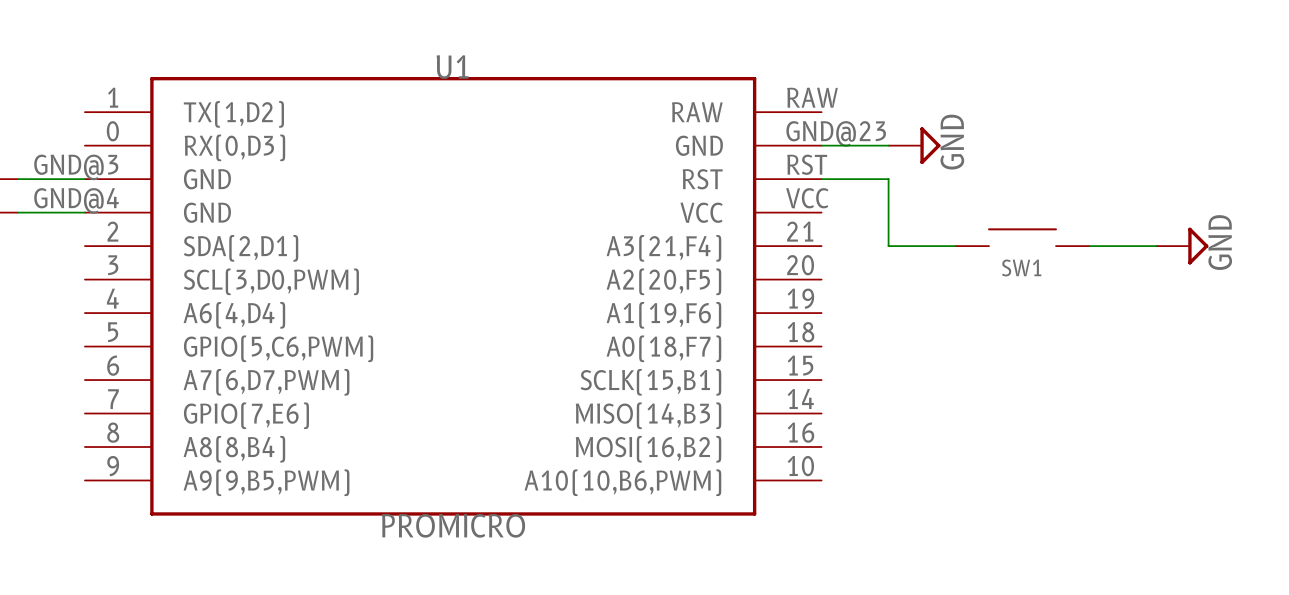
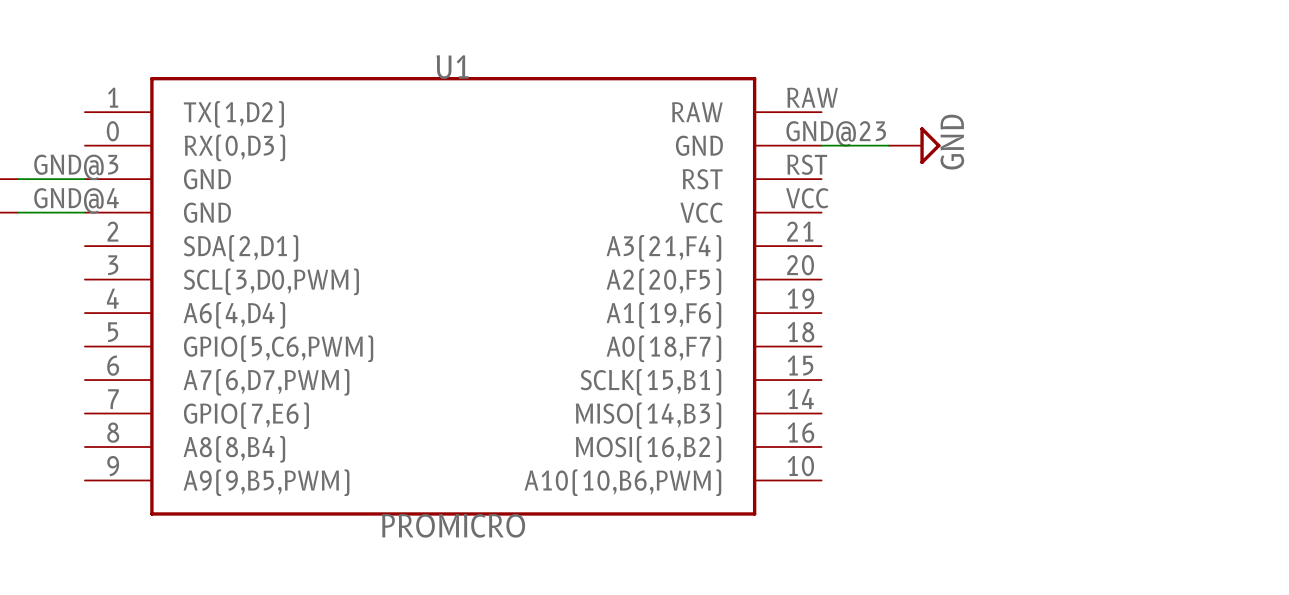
wire: (821, 179) (888, 179) (888, 246) (955, 246) -> none
SW1: (1022, 237) -> none
wire: (1089, 246) (1156, 246) -> none
power symbol: GND (1182, 246) -> none

